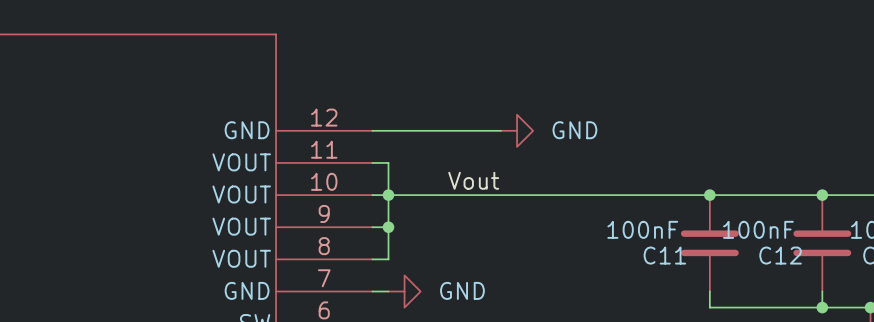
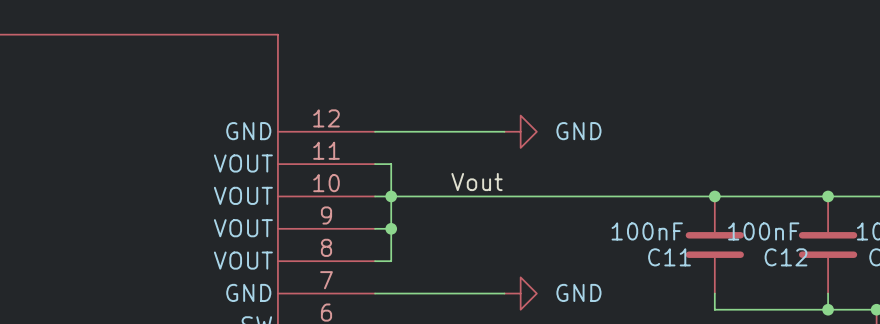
wire: none -> (391, 293) (504, 293)
power symbol position: GND (404, 291) -> GND (520, 293)

